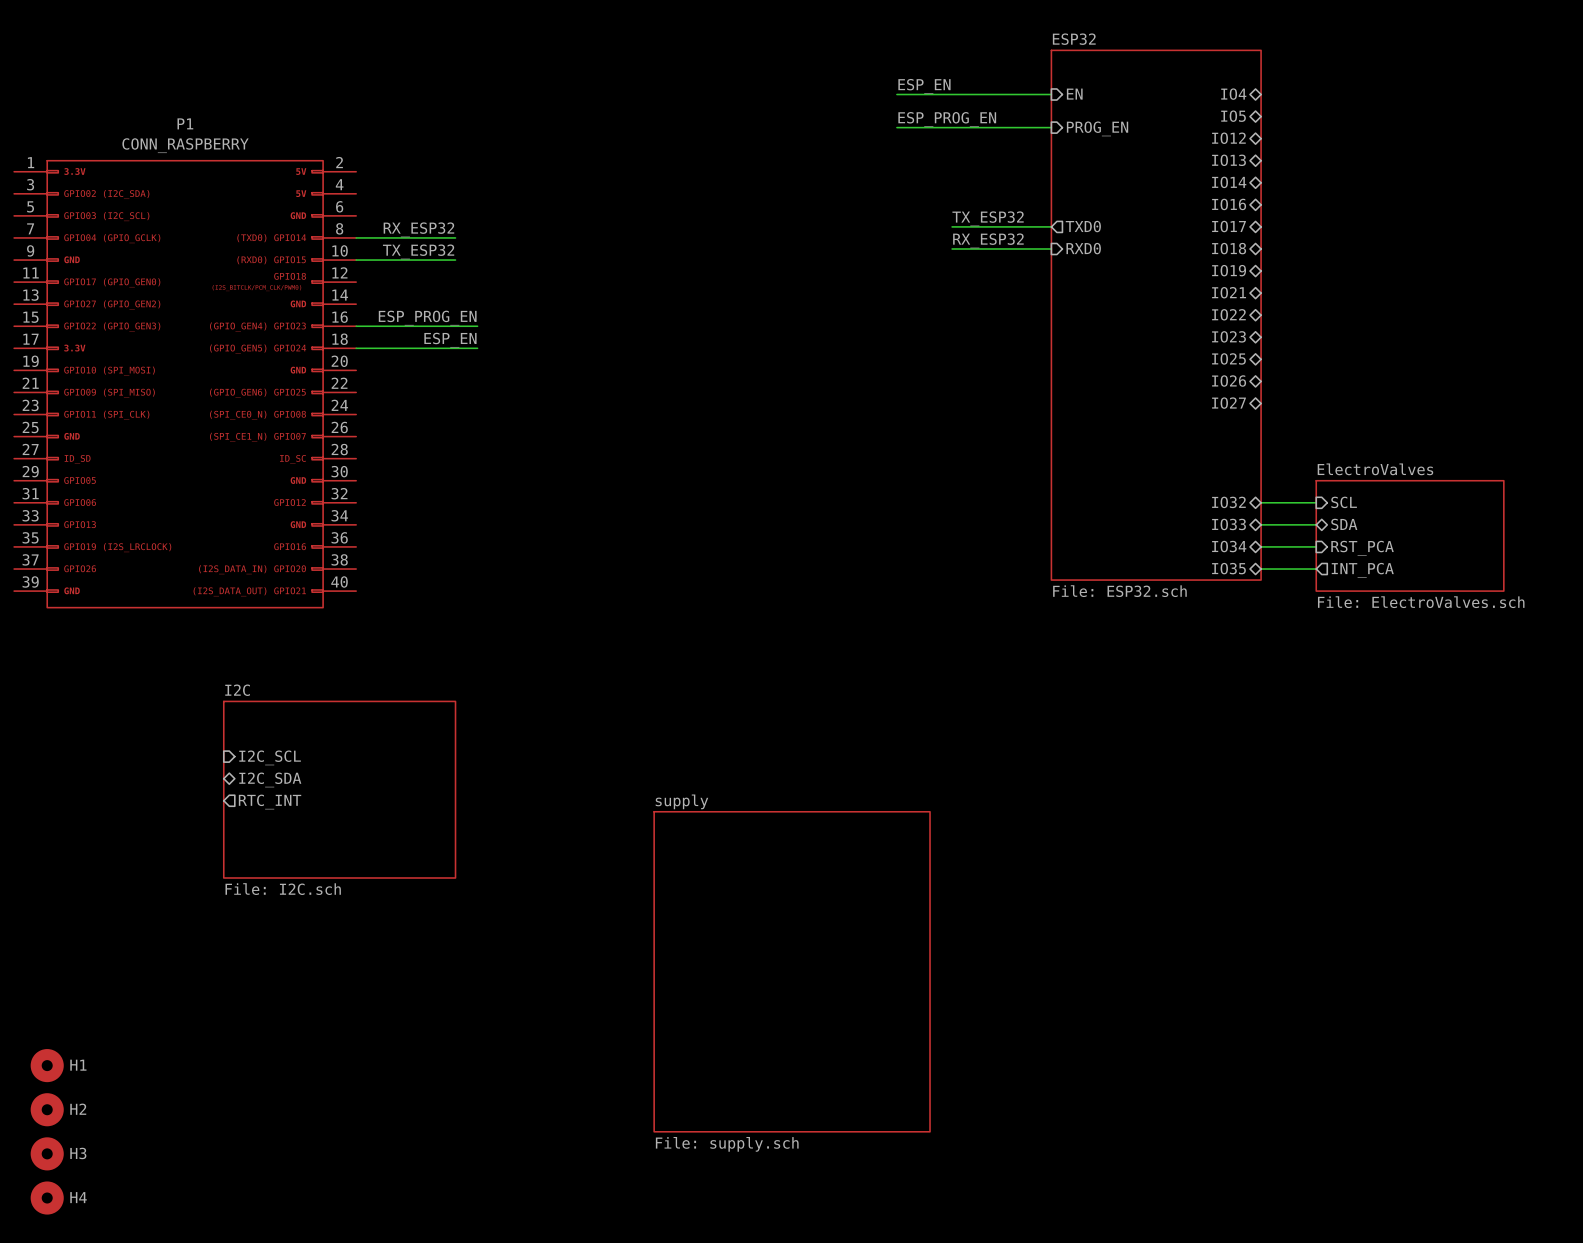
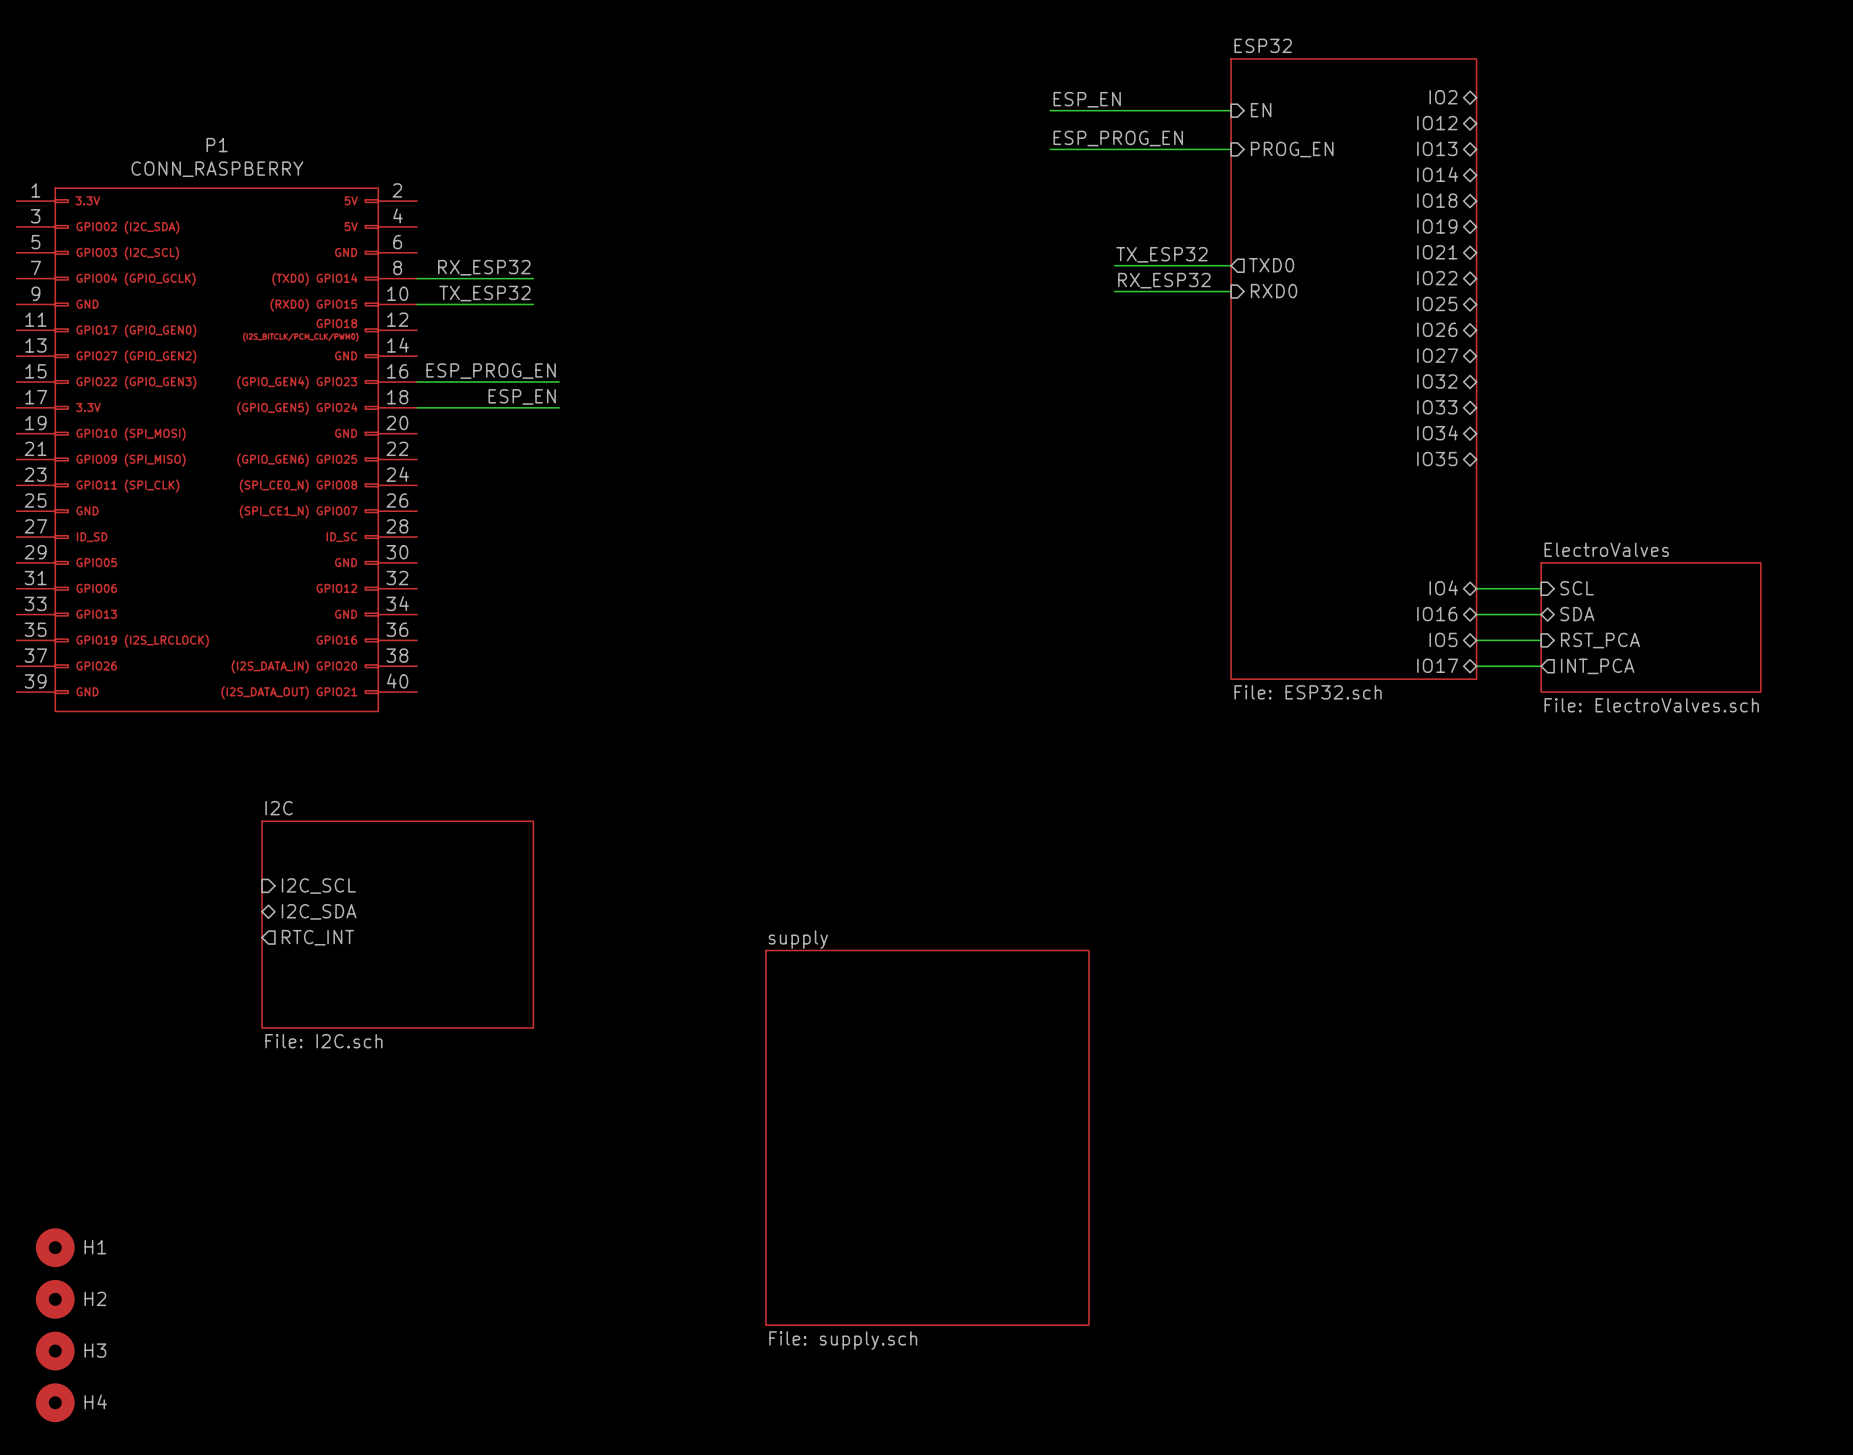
sheet pin: IO4 (1233, 94) -> IO2 (1443, 97)
sheet pin: IO5 (1233, 116) -> none
sheet pin position: IO12 (1228, 138) -> IO12 (1437, 123)
sheet pin position: IO13 (1229, 160) -> IO13 (1437, 148)
sheet pin position: IO14 (1229, 182) -> IO14 (1437, 174)
sheet pin: IO16 (1229, 204) -> none
sheet pin: IO17 (1229, 226) -> none
sheet pin position: IO18 (1229, 248) -> IO18 (1437, 200)
sheet pin position: IO19 (1229, 270) -> IO19 (1437, 226)
sheet pin position: IO21 (1229, 292) -> IO21 (1437, 252)
sheet pin position: IO22 (1228, 314) -> IO22 (1437, 278)
sheet pin: none -> IO32 (1437, 381)
sheet pin: IO23 (1229, 336) -> none
sheet pin: none -> IO33 (1437, 407)
sheet pin position: IO25 (1228, 358) -> IO25 (1437, 303)
sheet pin: none -> IO34 (1437, 432)
sheet pin position: IO26 (1229, 381) -> IO26 (1437, 329)
sheet pin: none -> IO35 (1437, 459)
sheet pin position: IO27 (1229, 403) -> IO27 (1437, 355)
sheet pin: IO32 (1228, 502) -> IO4 (1443, 587)
sheet pin: IO33 (1229, 524) -> IO16 (1437, 614)
sheet pin: IO34 (1229, 546) -> IO5 (1443, 639)
sheet pin: IO35 (1228, 568) -> IO17 (1437, 665)

